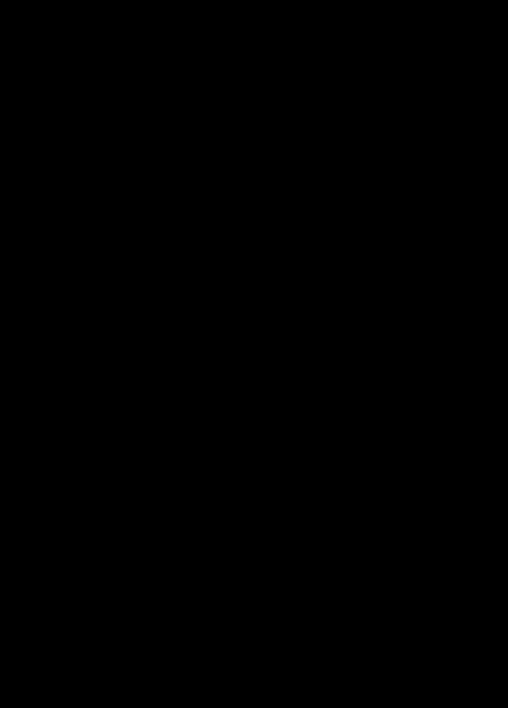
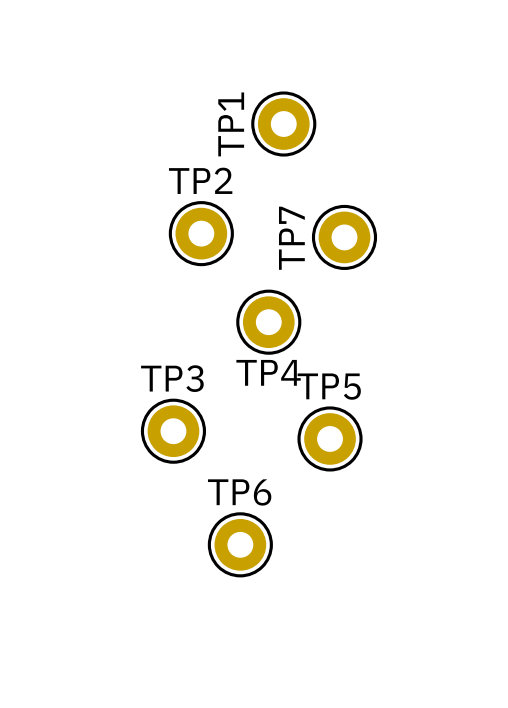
TP1: none -> (283, 124)
TP2: none -> (201, 233)
TP7: none -> (344, 237)
TP4: none -> (268, 322)
TP3: none -> (173, 431)
TP5: none -> (330, 438)
TP6: none -> (240, 544)

